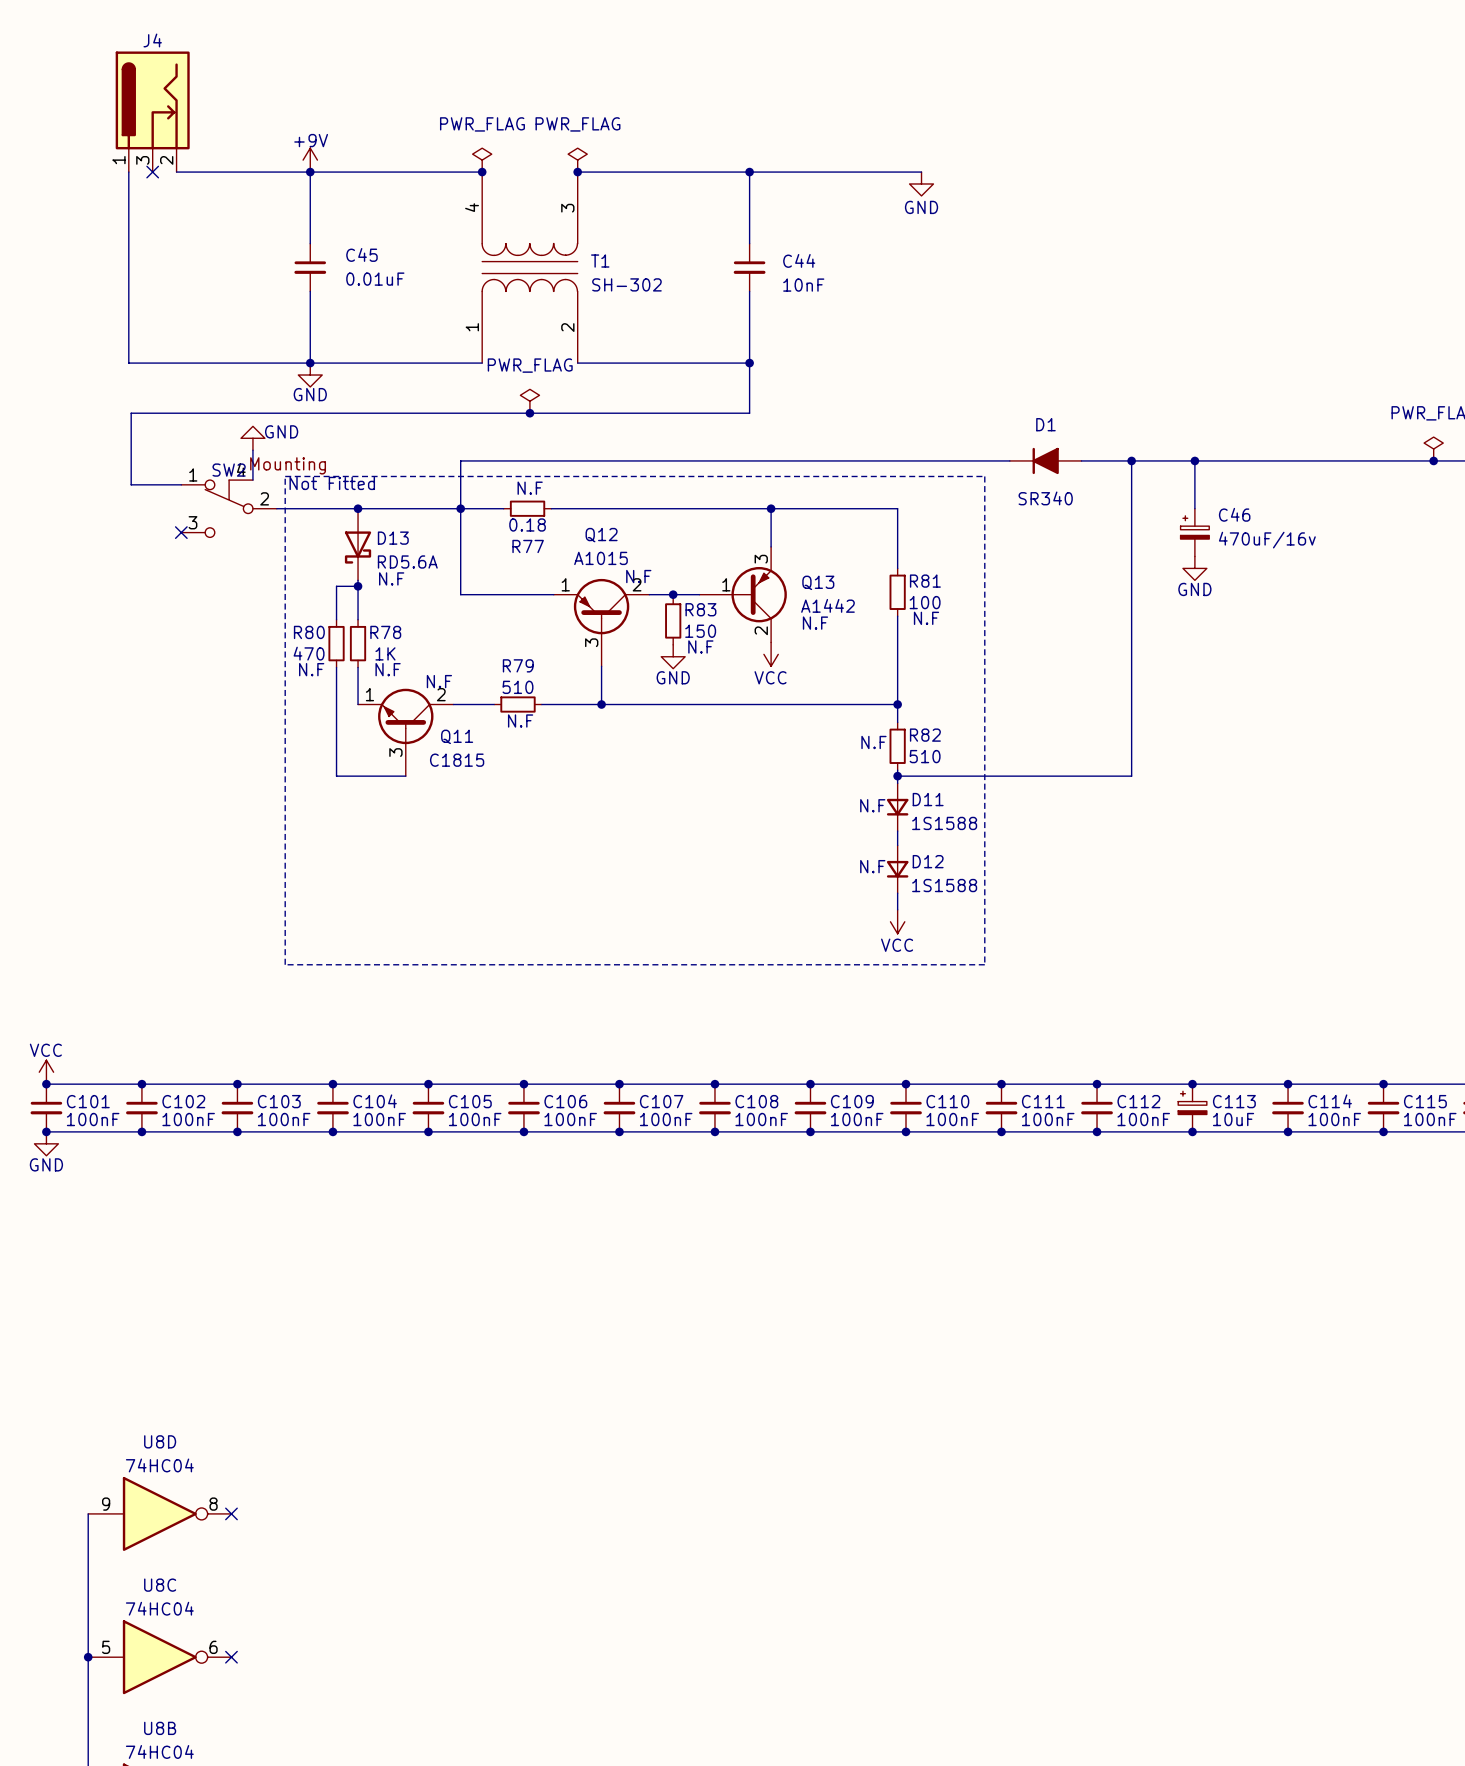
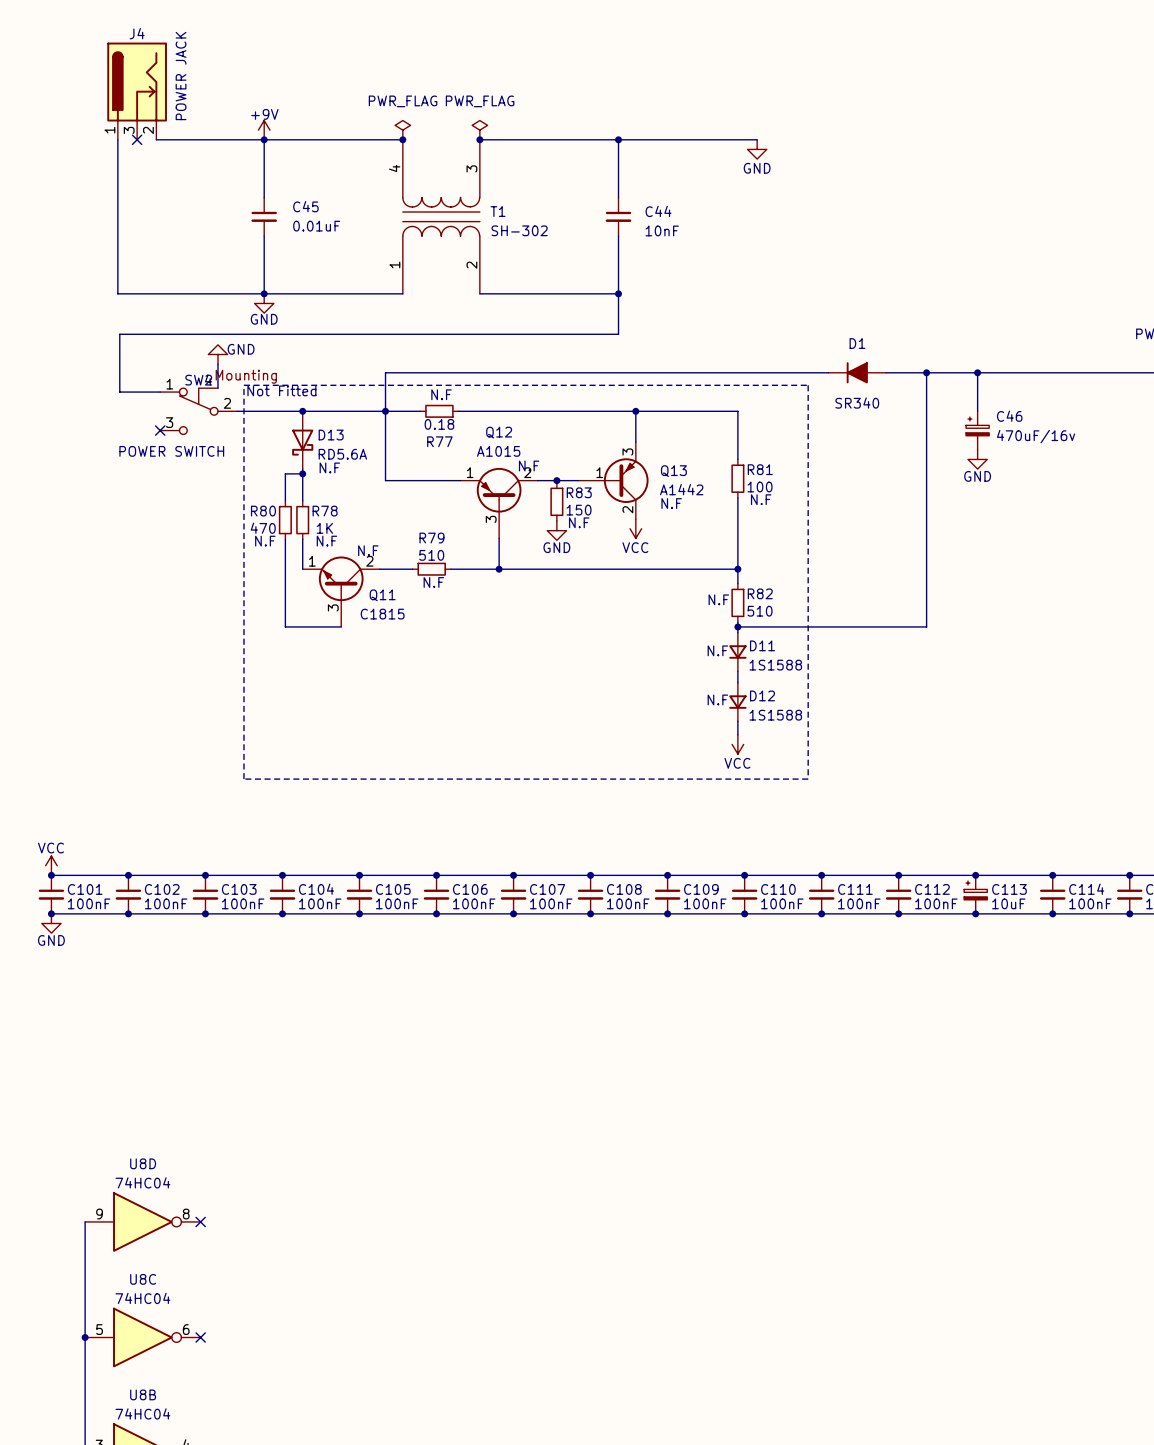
J4 value: none -> POWER JACK (181, 76)
power symbol: PWR_FLAG (529, 401) -> none
junction: (529, 413) -> none
SW2 value: none -> POWER SWITCH (171, 451)

